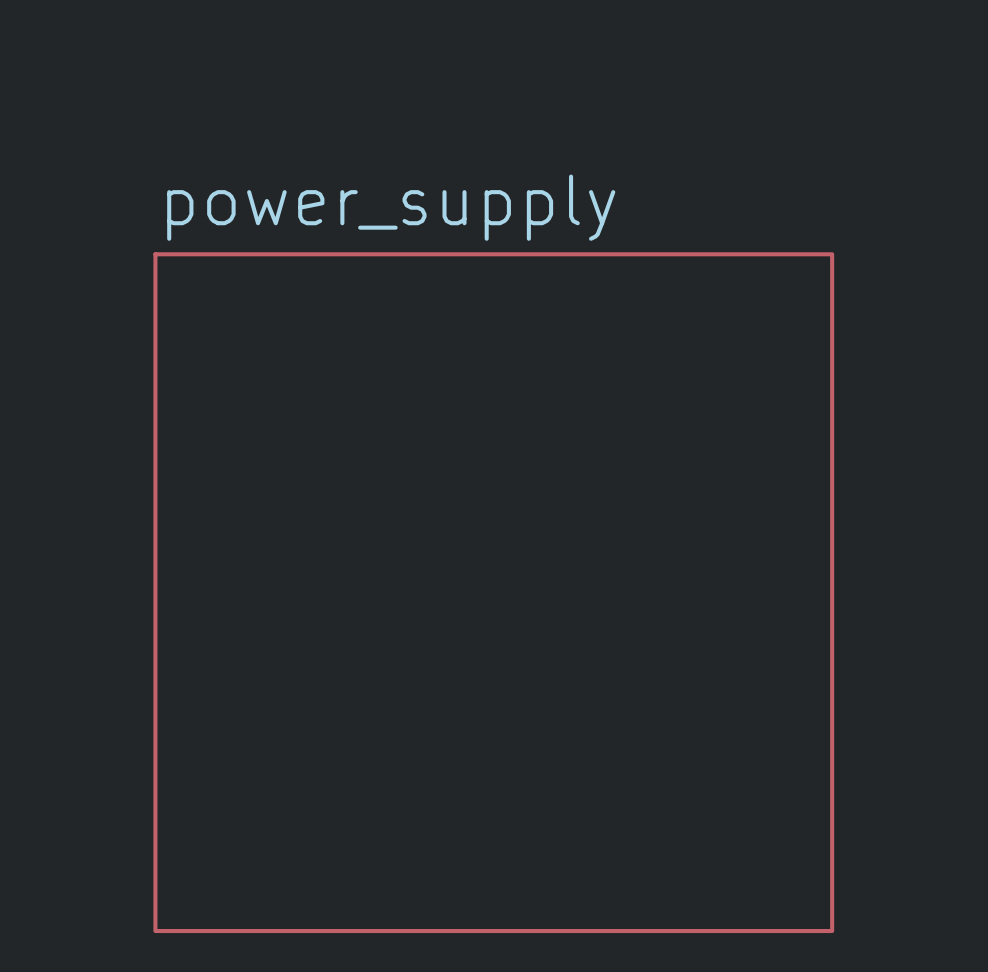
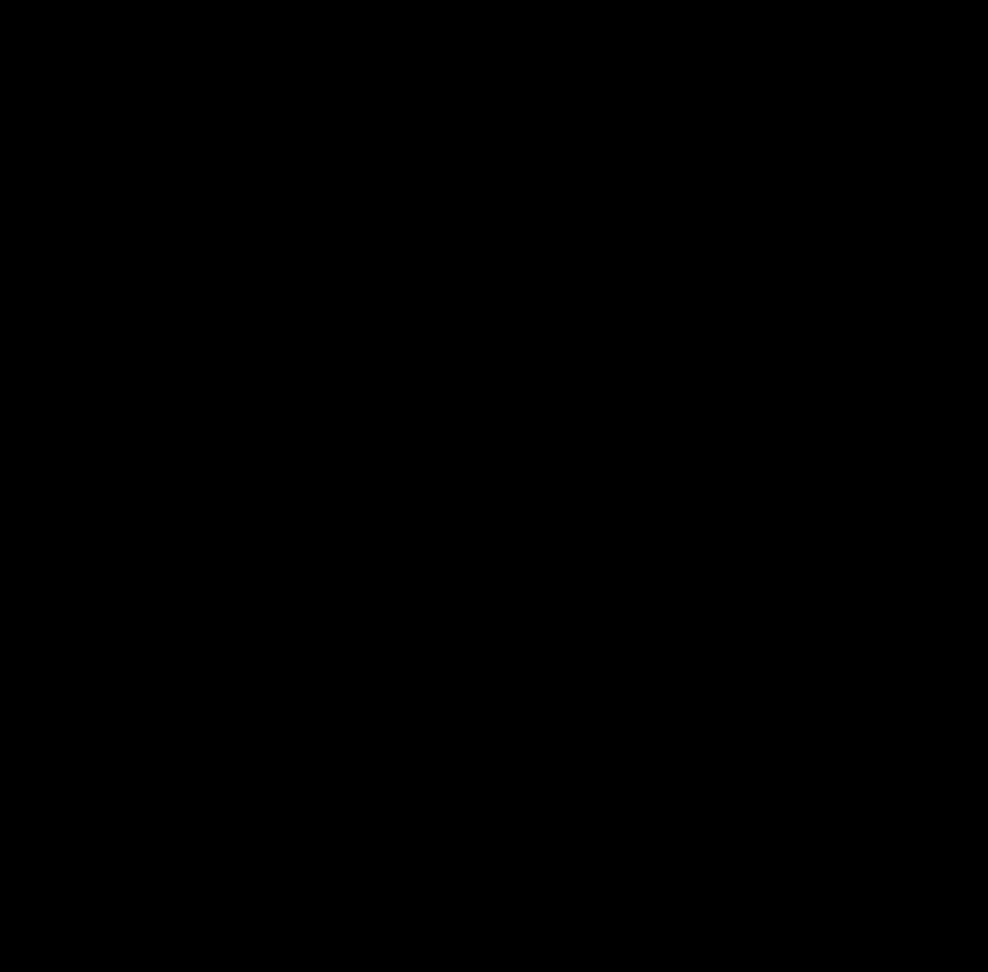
sheet power_supply: (493, 592) -> none

